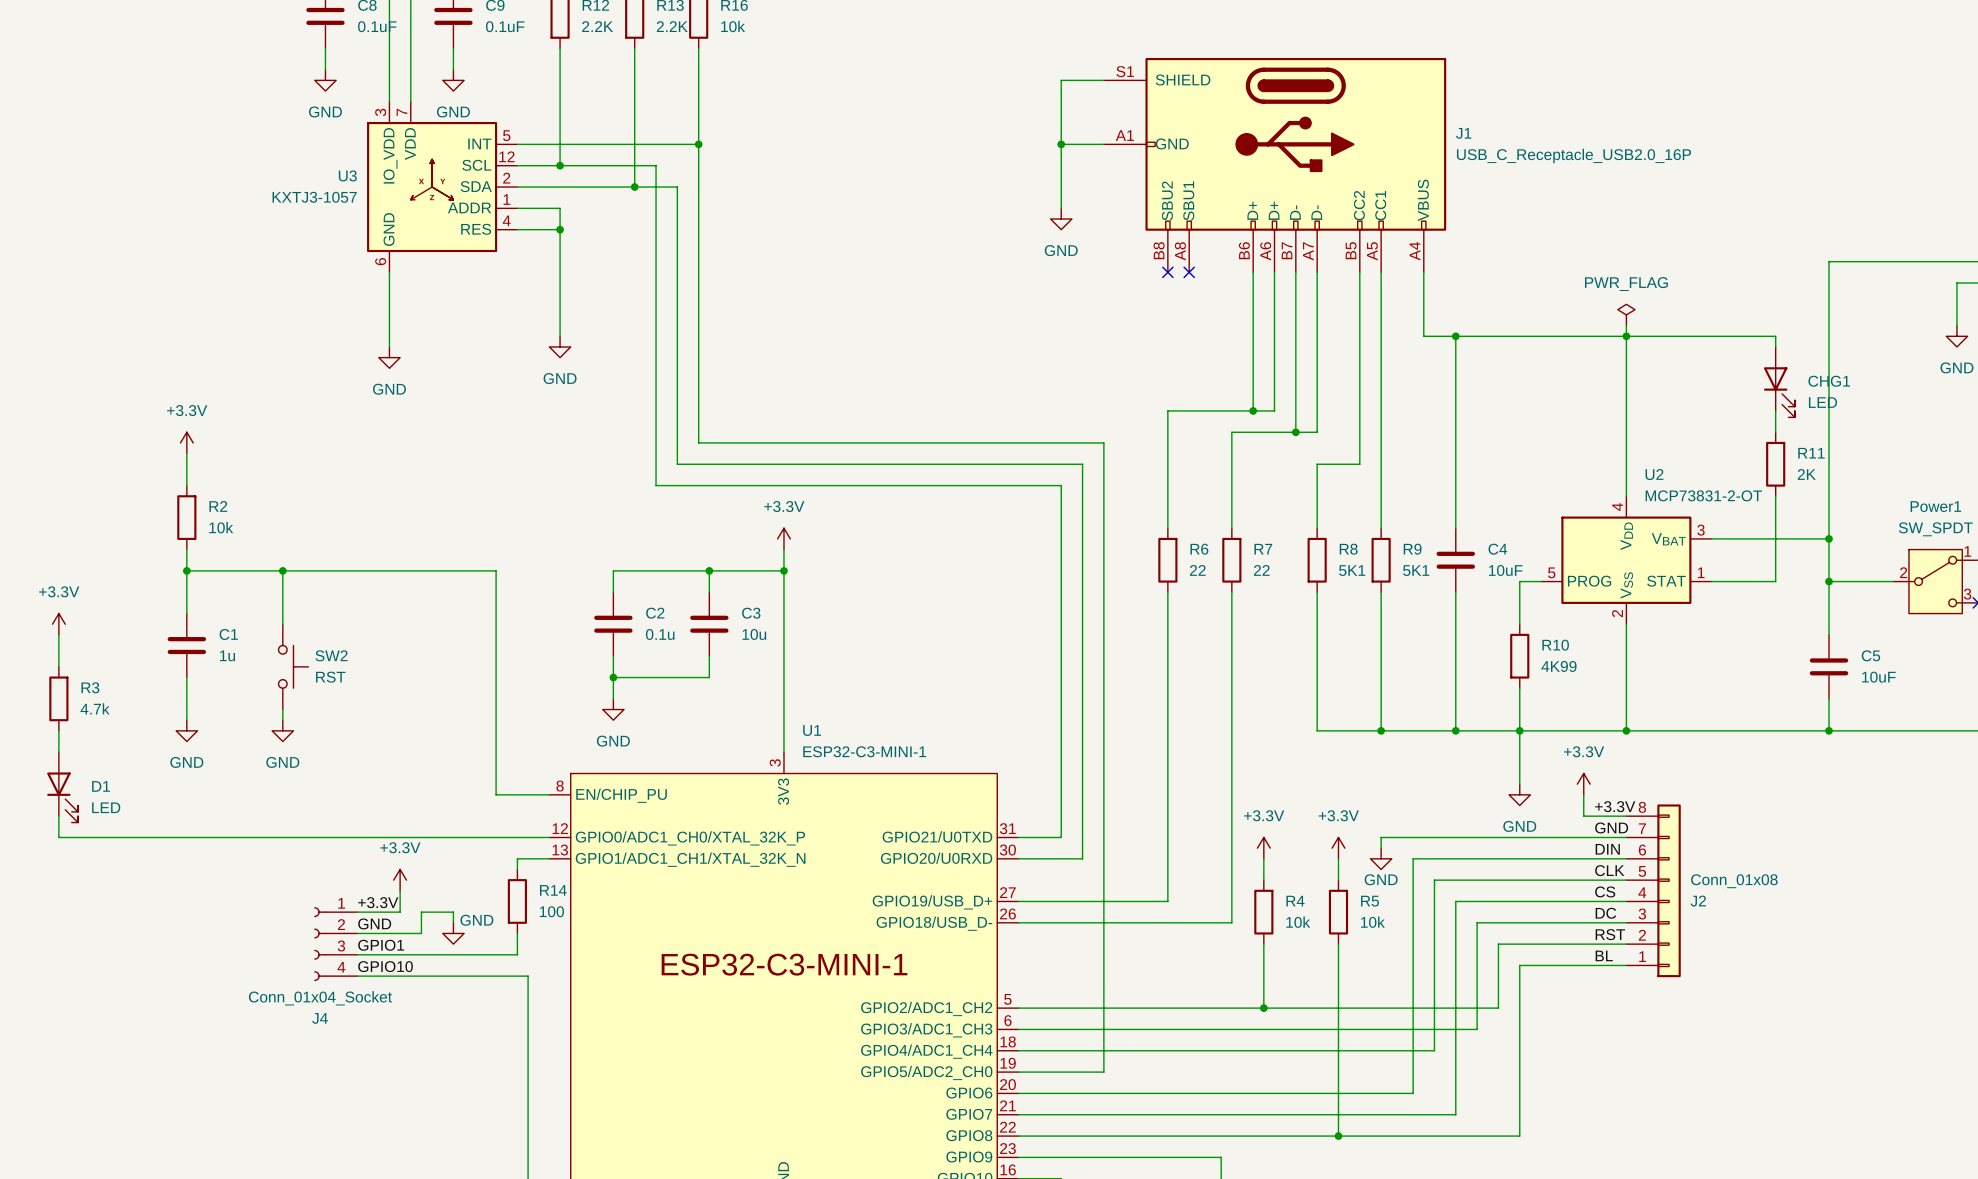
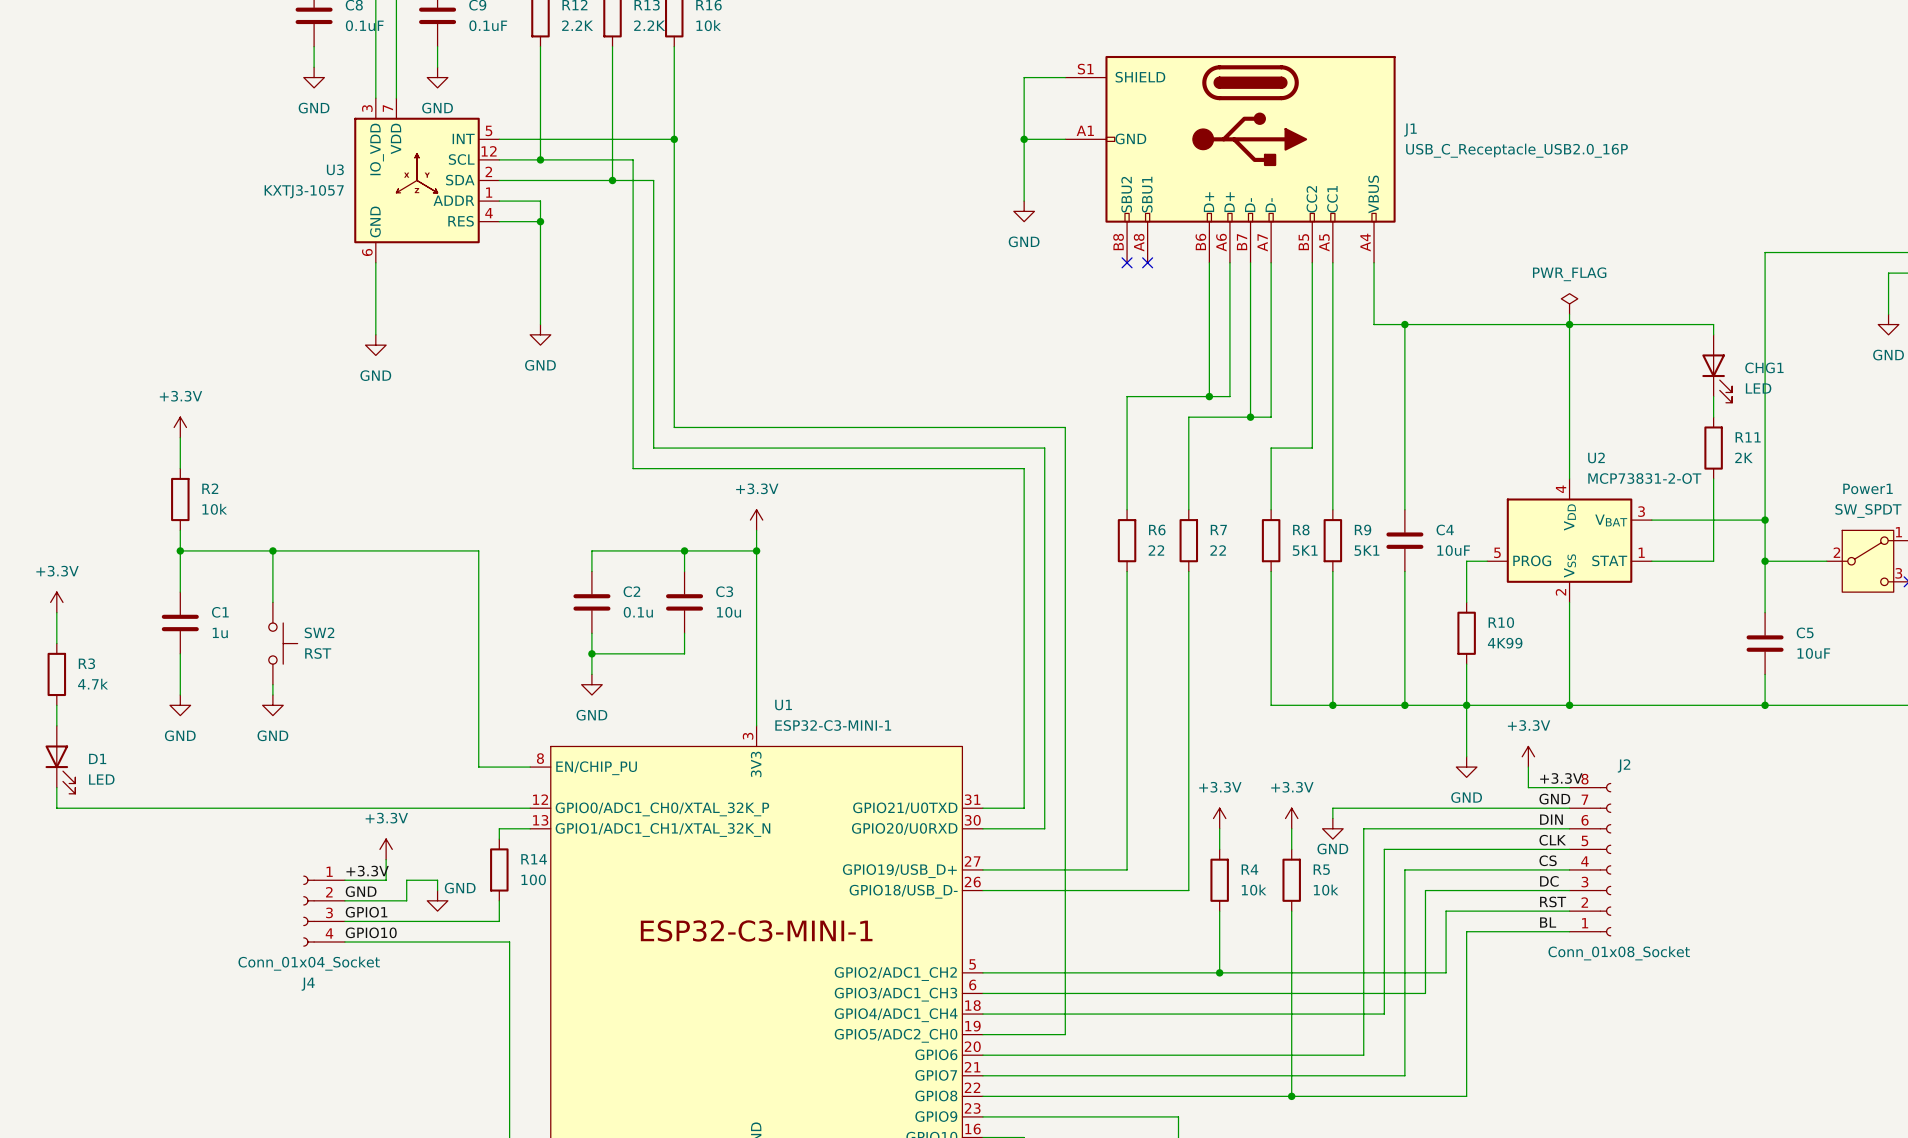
J2 symbol: [1626, 804, 1681, 978] -> [1569, 782, 1612, 937]
J2 value: Conn_01x08 (1734, 881) -> Conn_01x08_Socket (1619, 953)
J2 name position: J2 (1698, 901) -> J2 (1624, 765)

